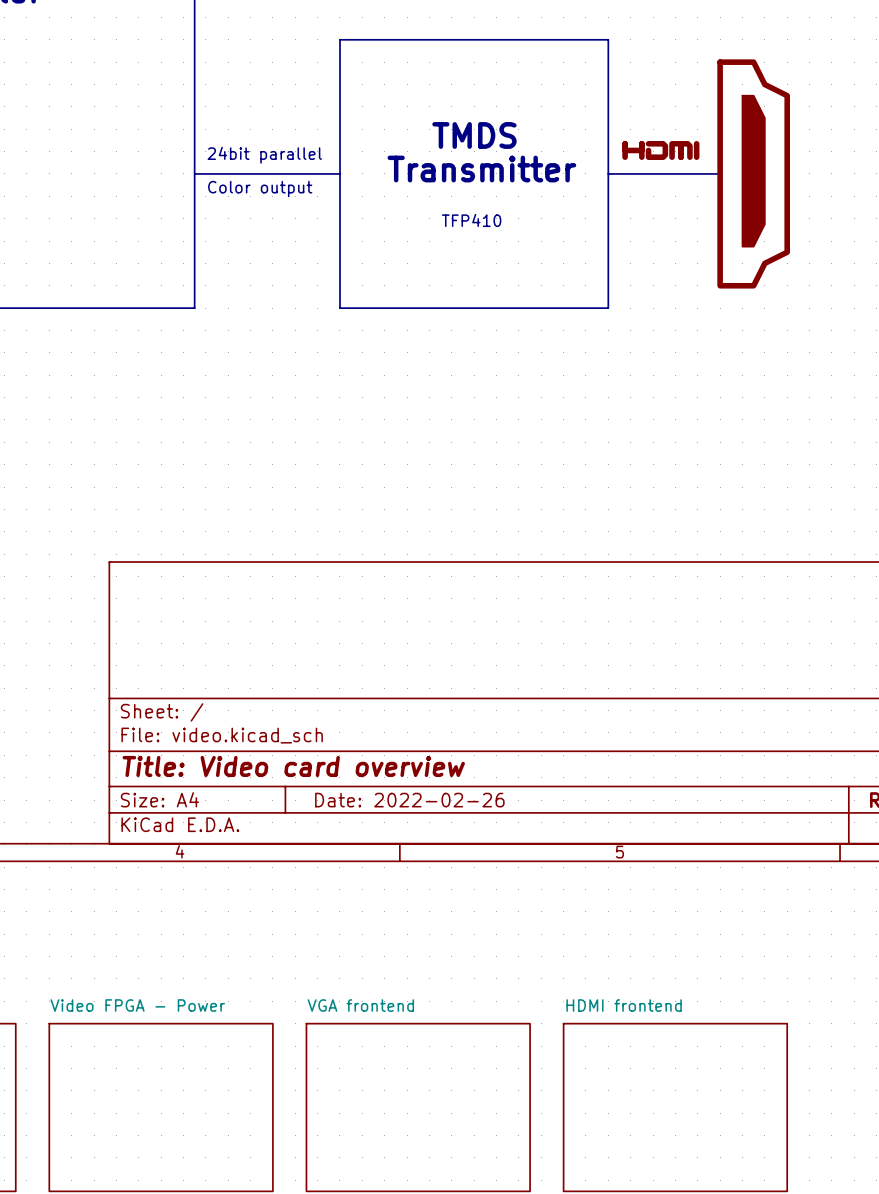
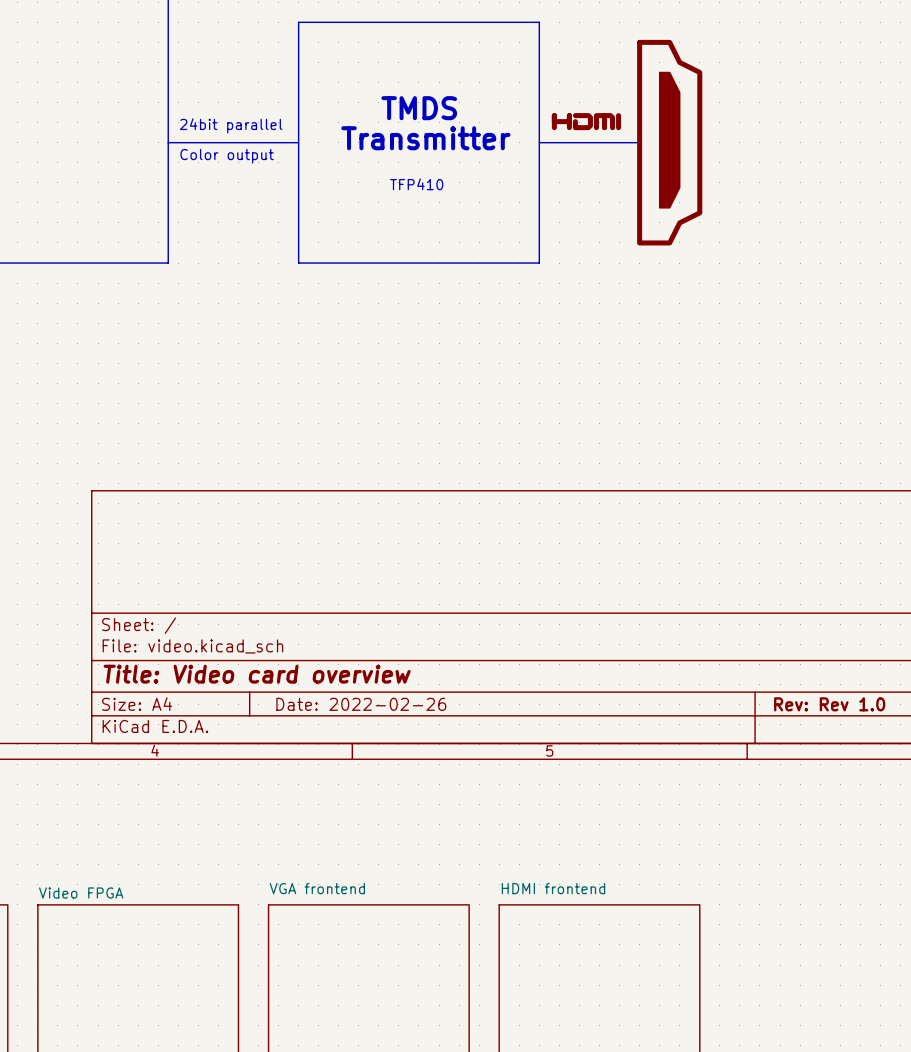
sheet Video FPGA - Power name: Video FPGA - Power (137, 1005) -> Video FPGA (81, 893)

